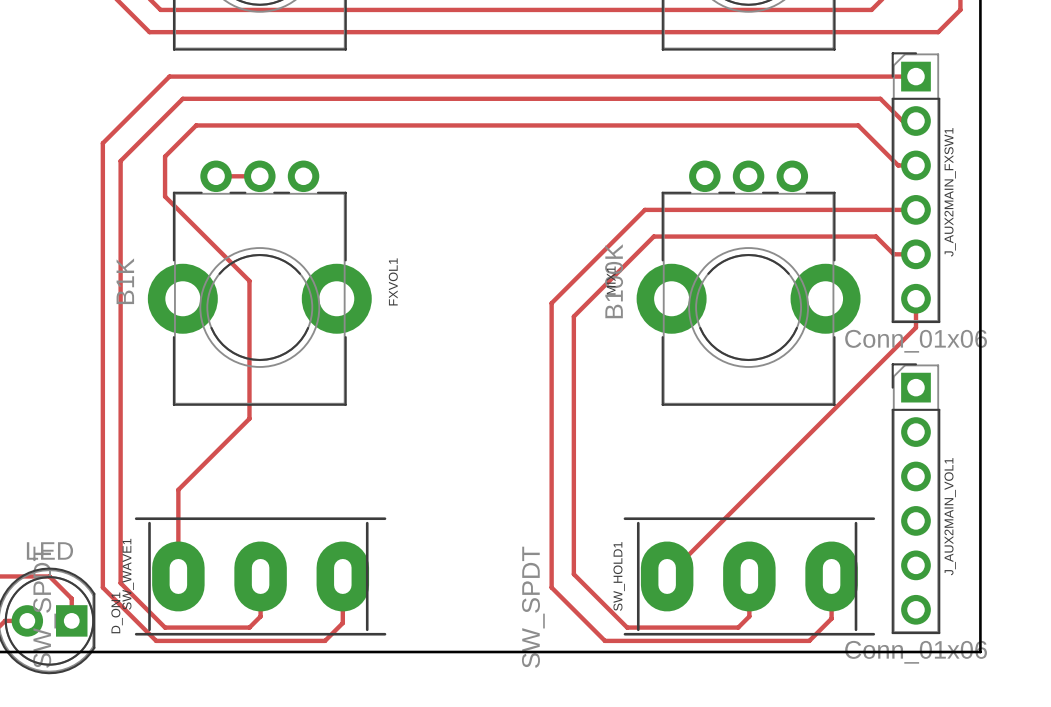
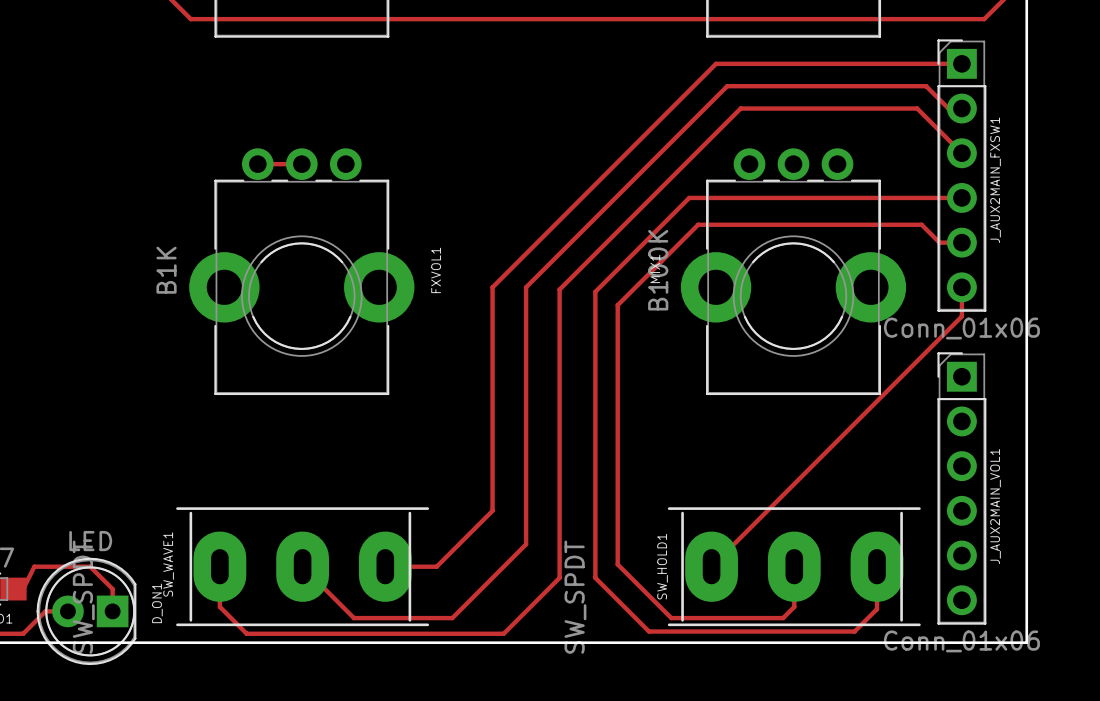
track: (671, 76) (169, 76) (102, 143) (102, 587) (156, 640) (325, 640) (342, 623) (342, 576) -> (716, 63) (492, 287) (492, 510) (436, 566) (385, 566)
track: (682, 98) (182, 98) (120, 161) (120, 583) (165, 627) (249, 627) (260, 616) (260, 585) -> (727, 86) (526, 287) (526, 544) (452, 618) (354, 618) (302, 566)
track: (915, 165) (898, 165) (858, 125) (196, 125) (165, 156) (165, 196) (249, 280) (249, 418) (178, 489) (178, 576) -> (961, 153) (917, 108) (740, 108) (559, 289) (559, 577) (503, 633) (246, 633) (219, 606) (219, 566)

